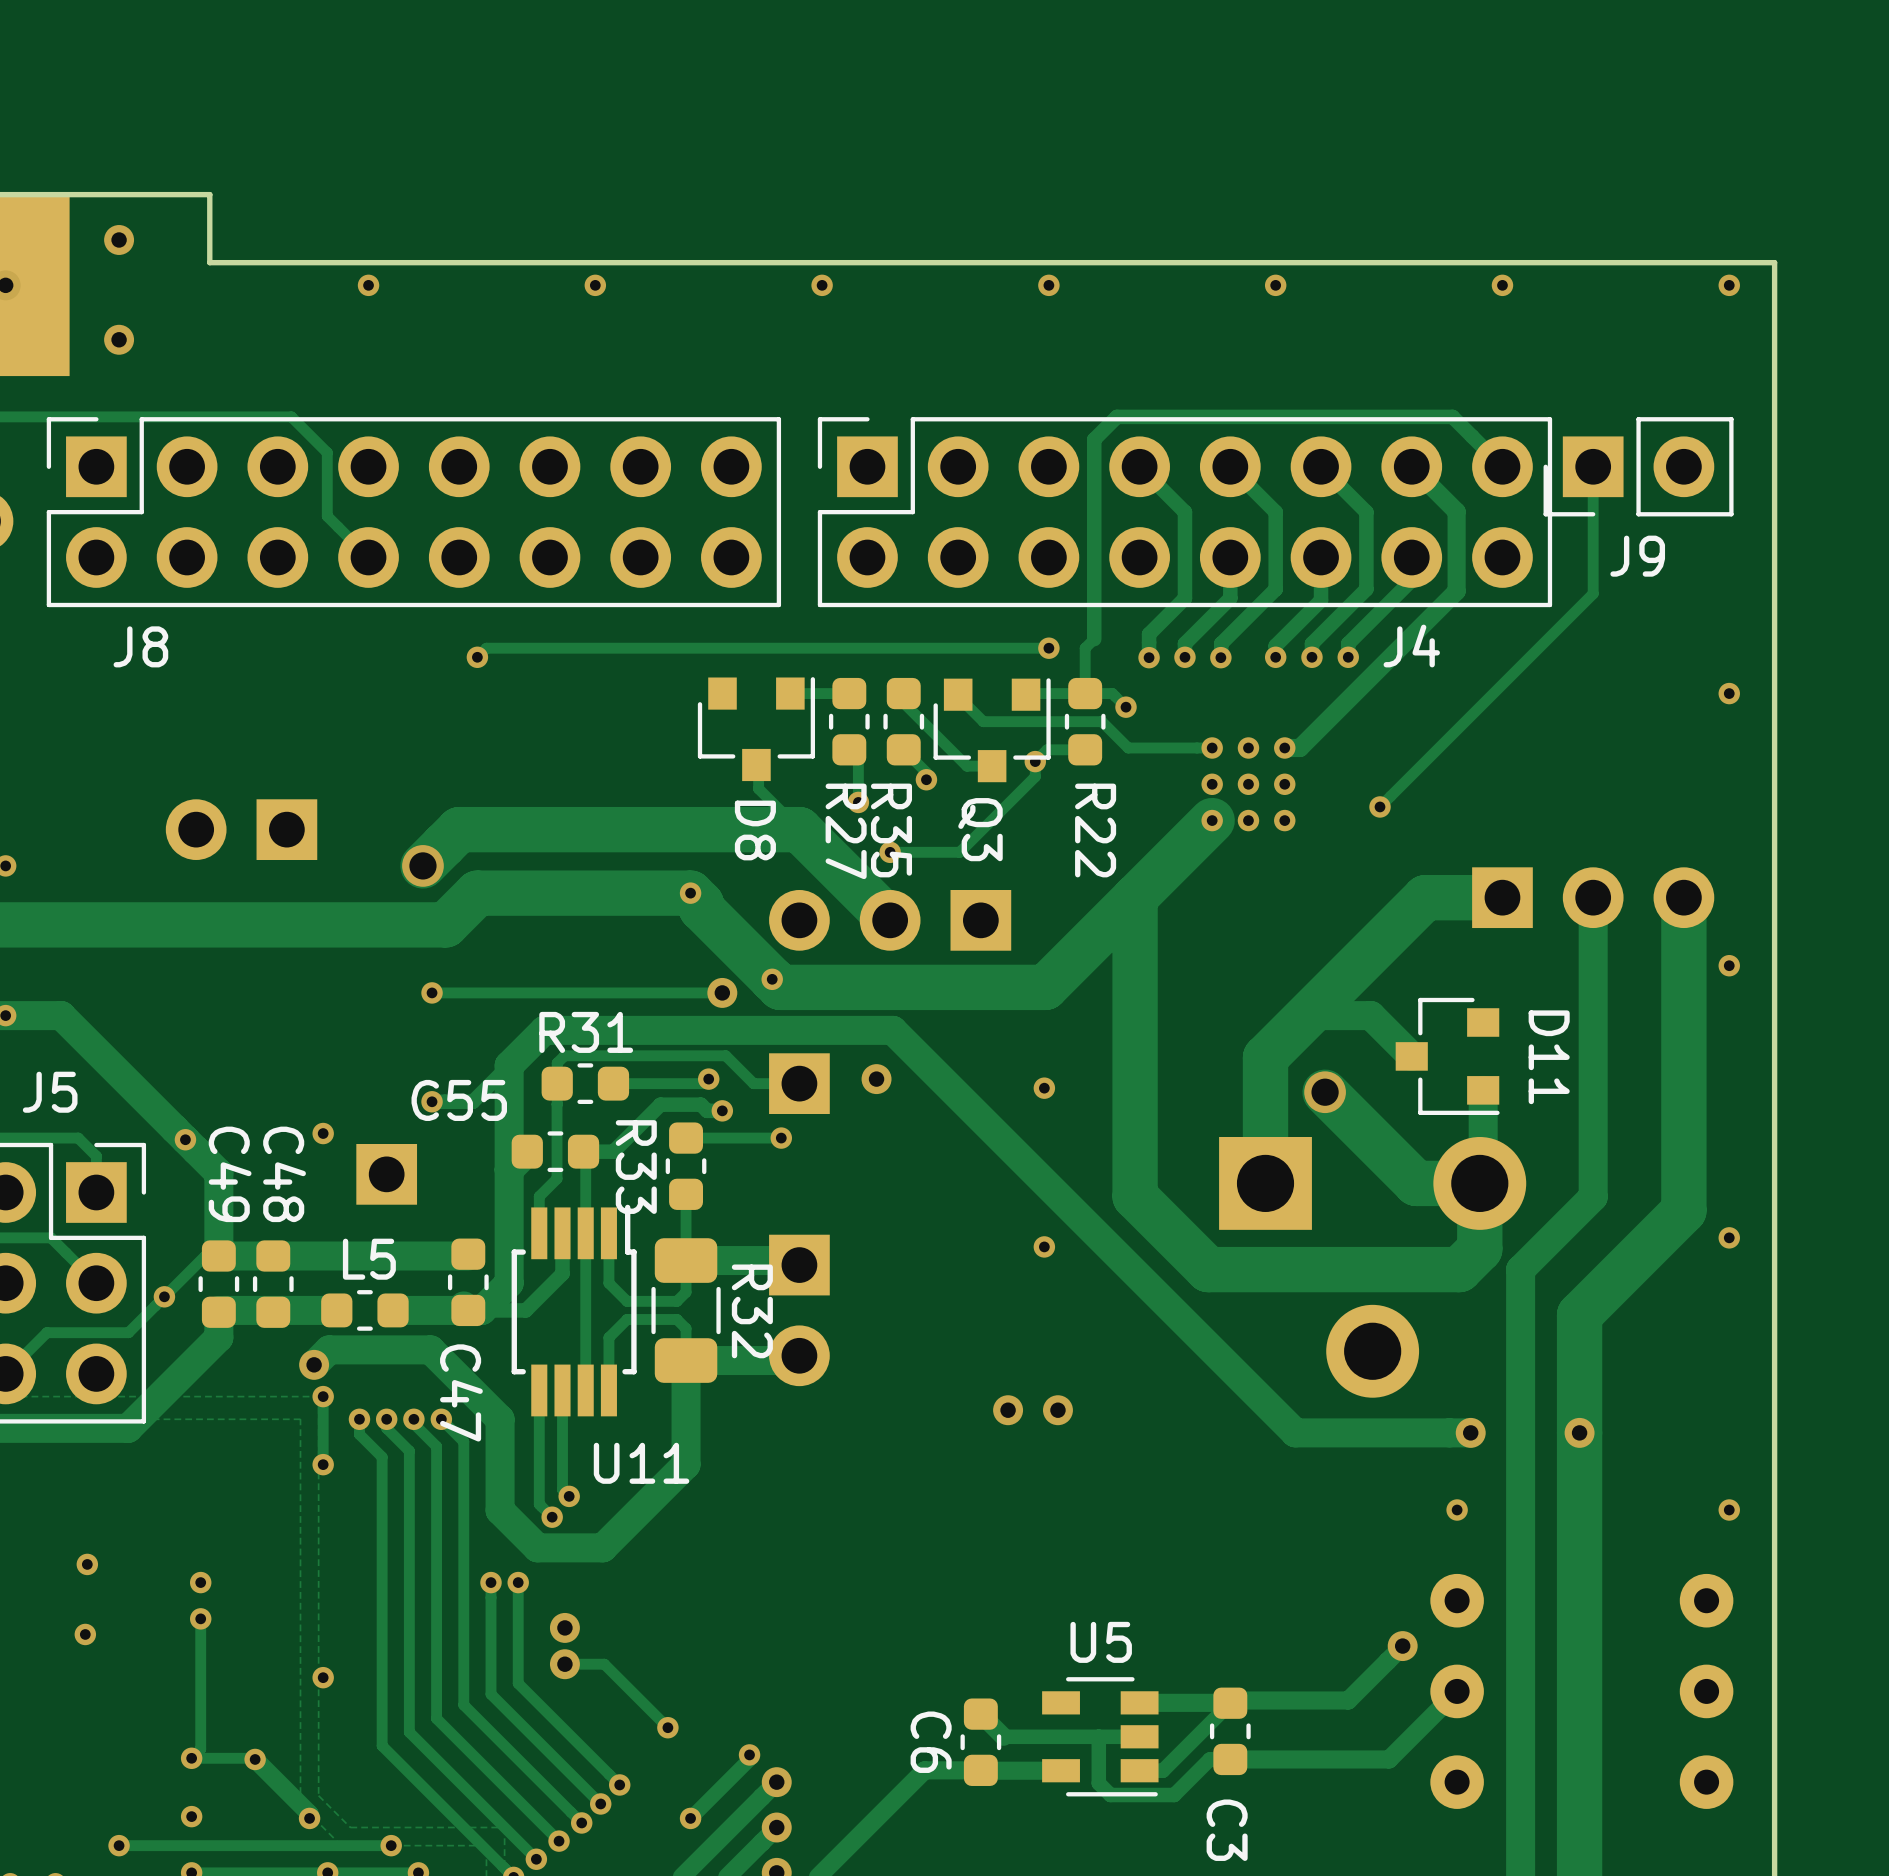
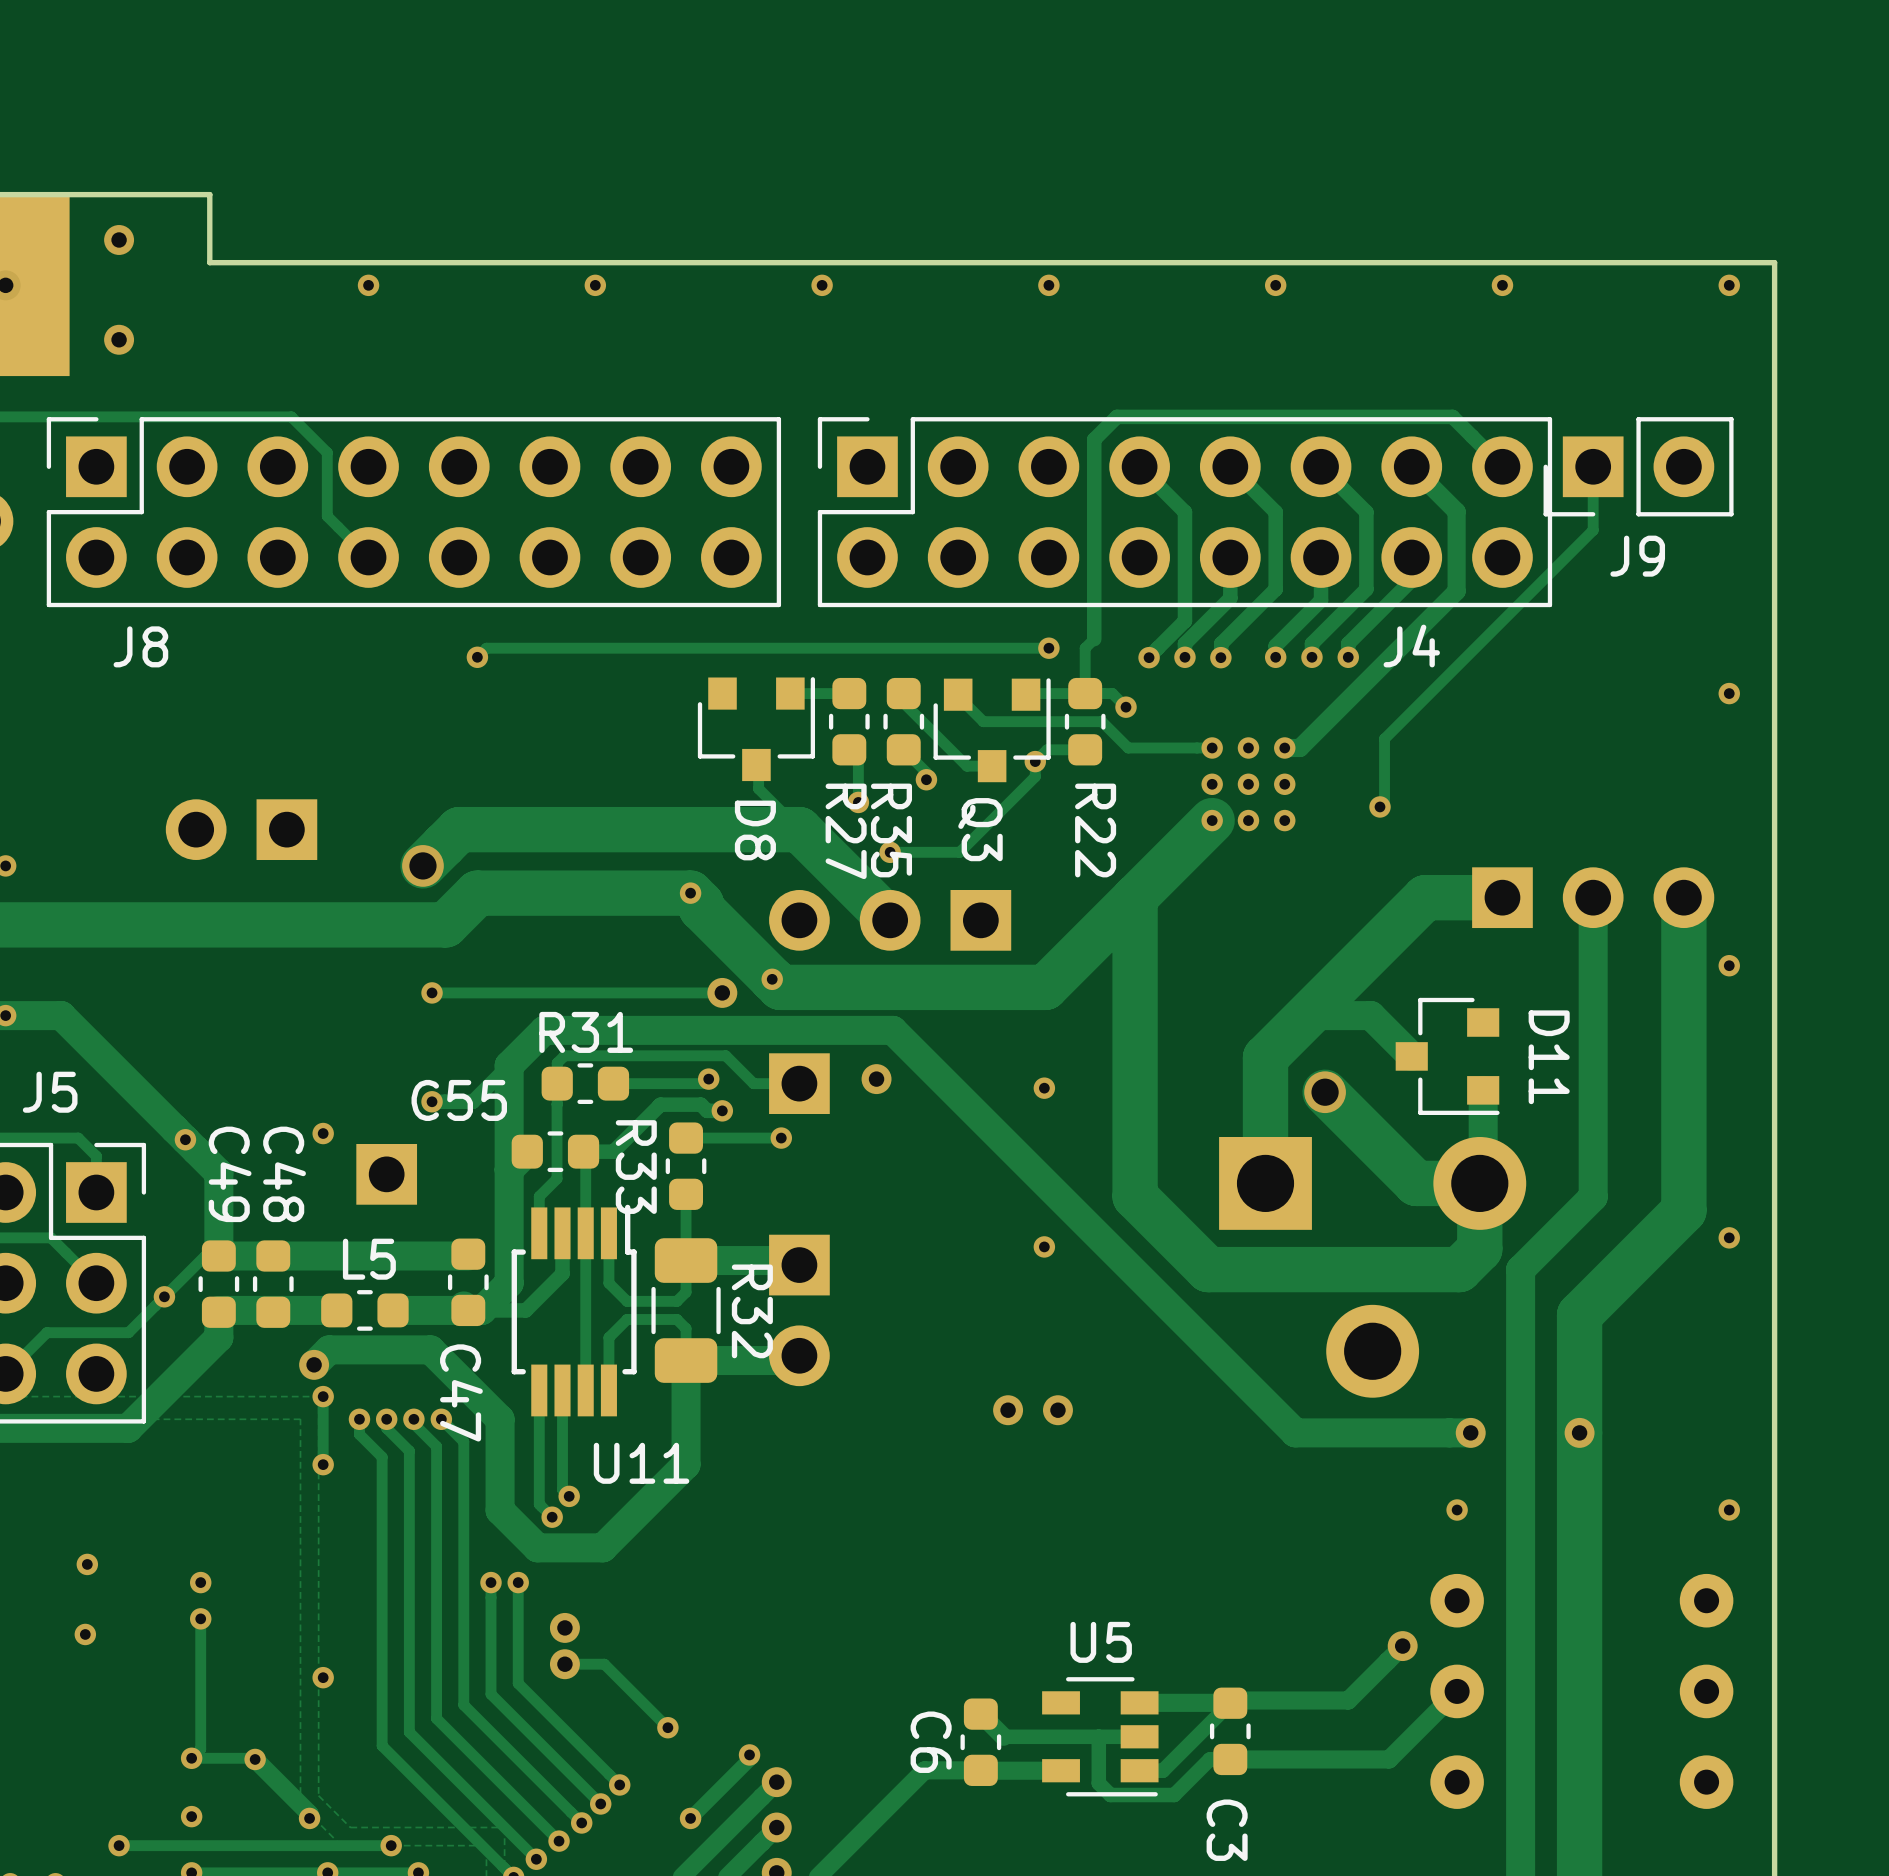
track: (1593, 530) (1593, 593) (1380, 806) -> (1593, 530) (1384, 738) (1384, 806)
track: (1184, 598) (1149, 634) (1149, 657) -> (1184, 598) (1184, 620) (1148, 657)

